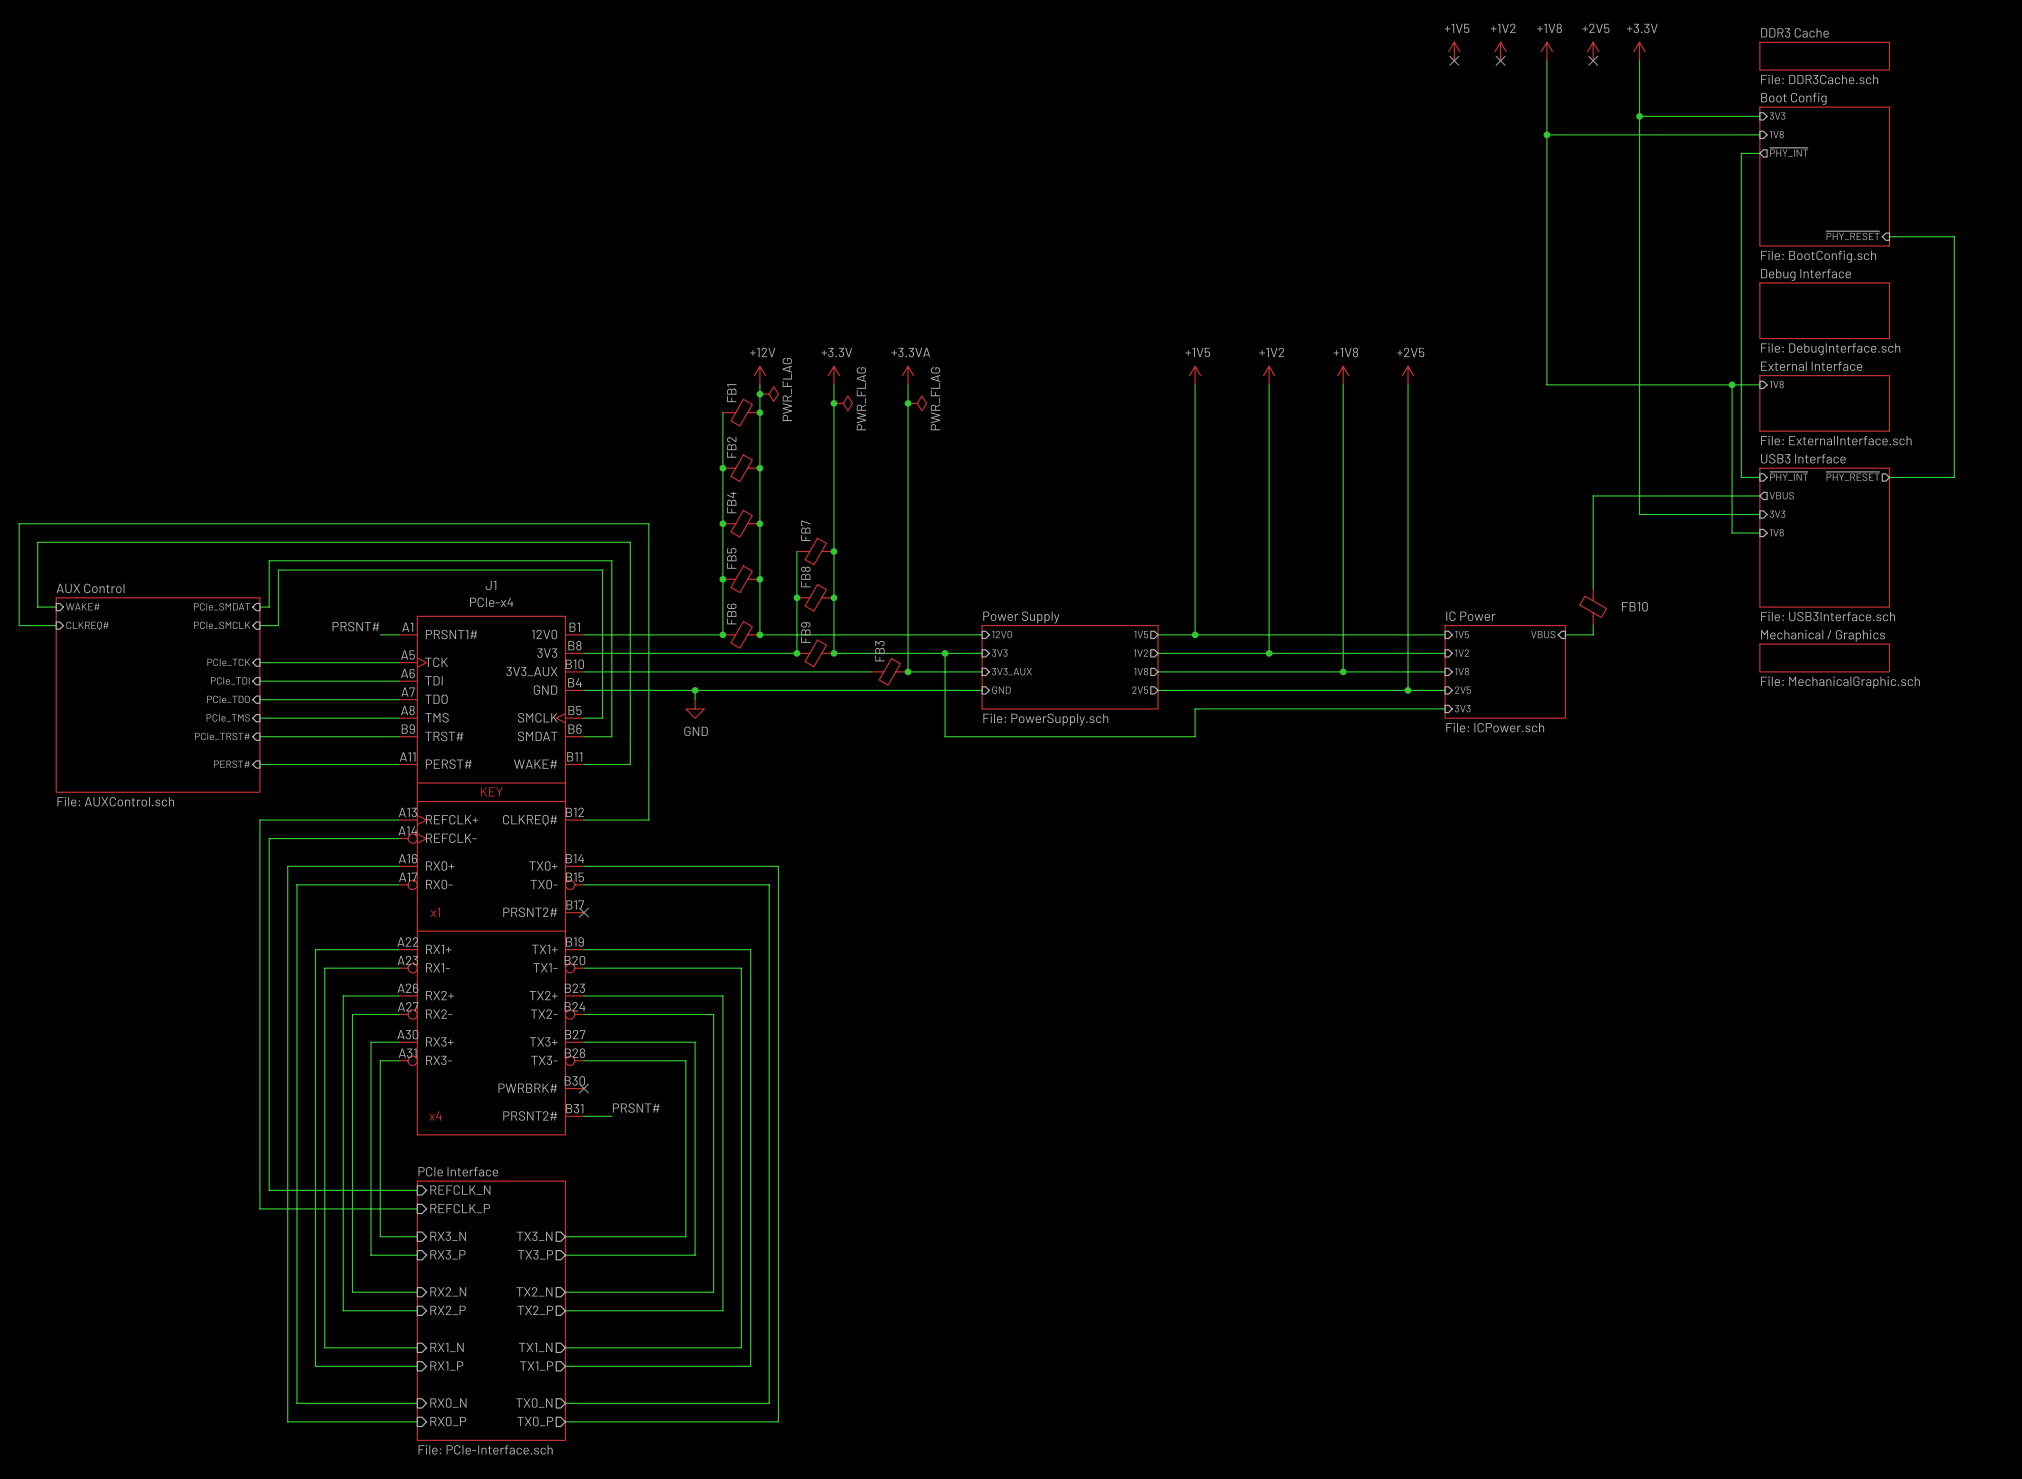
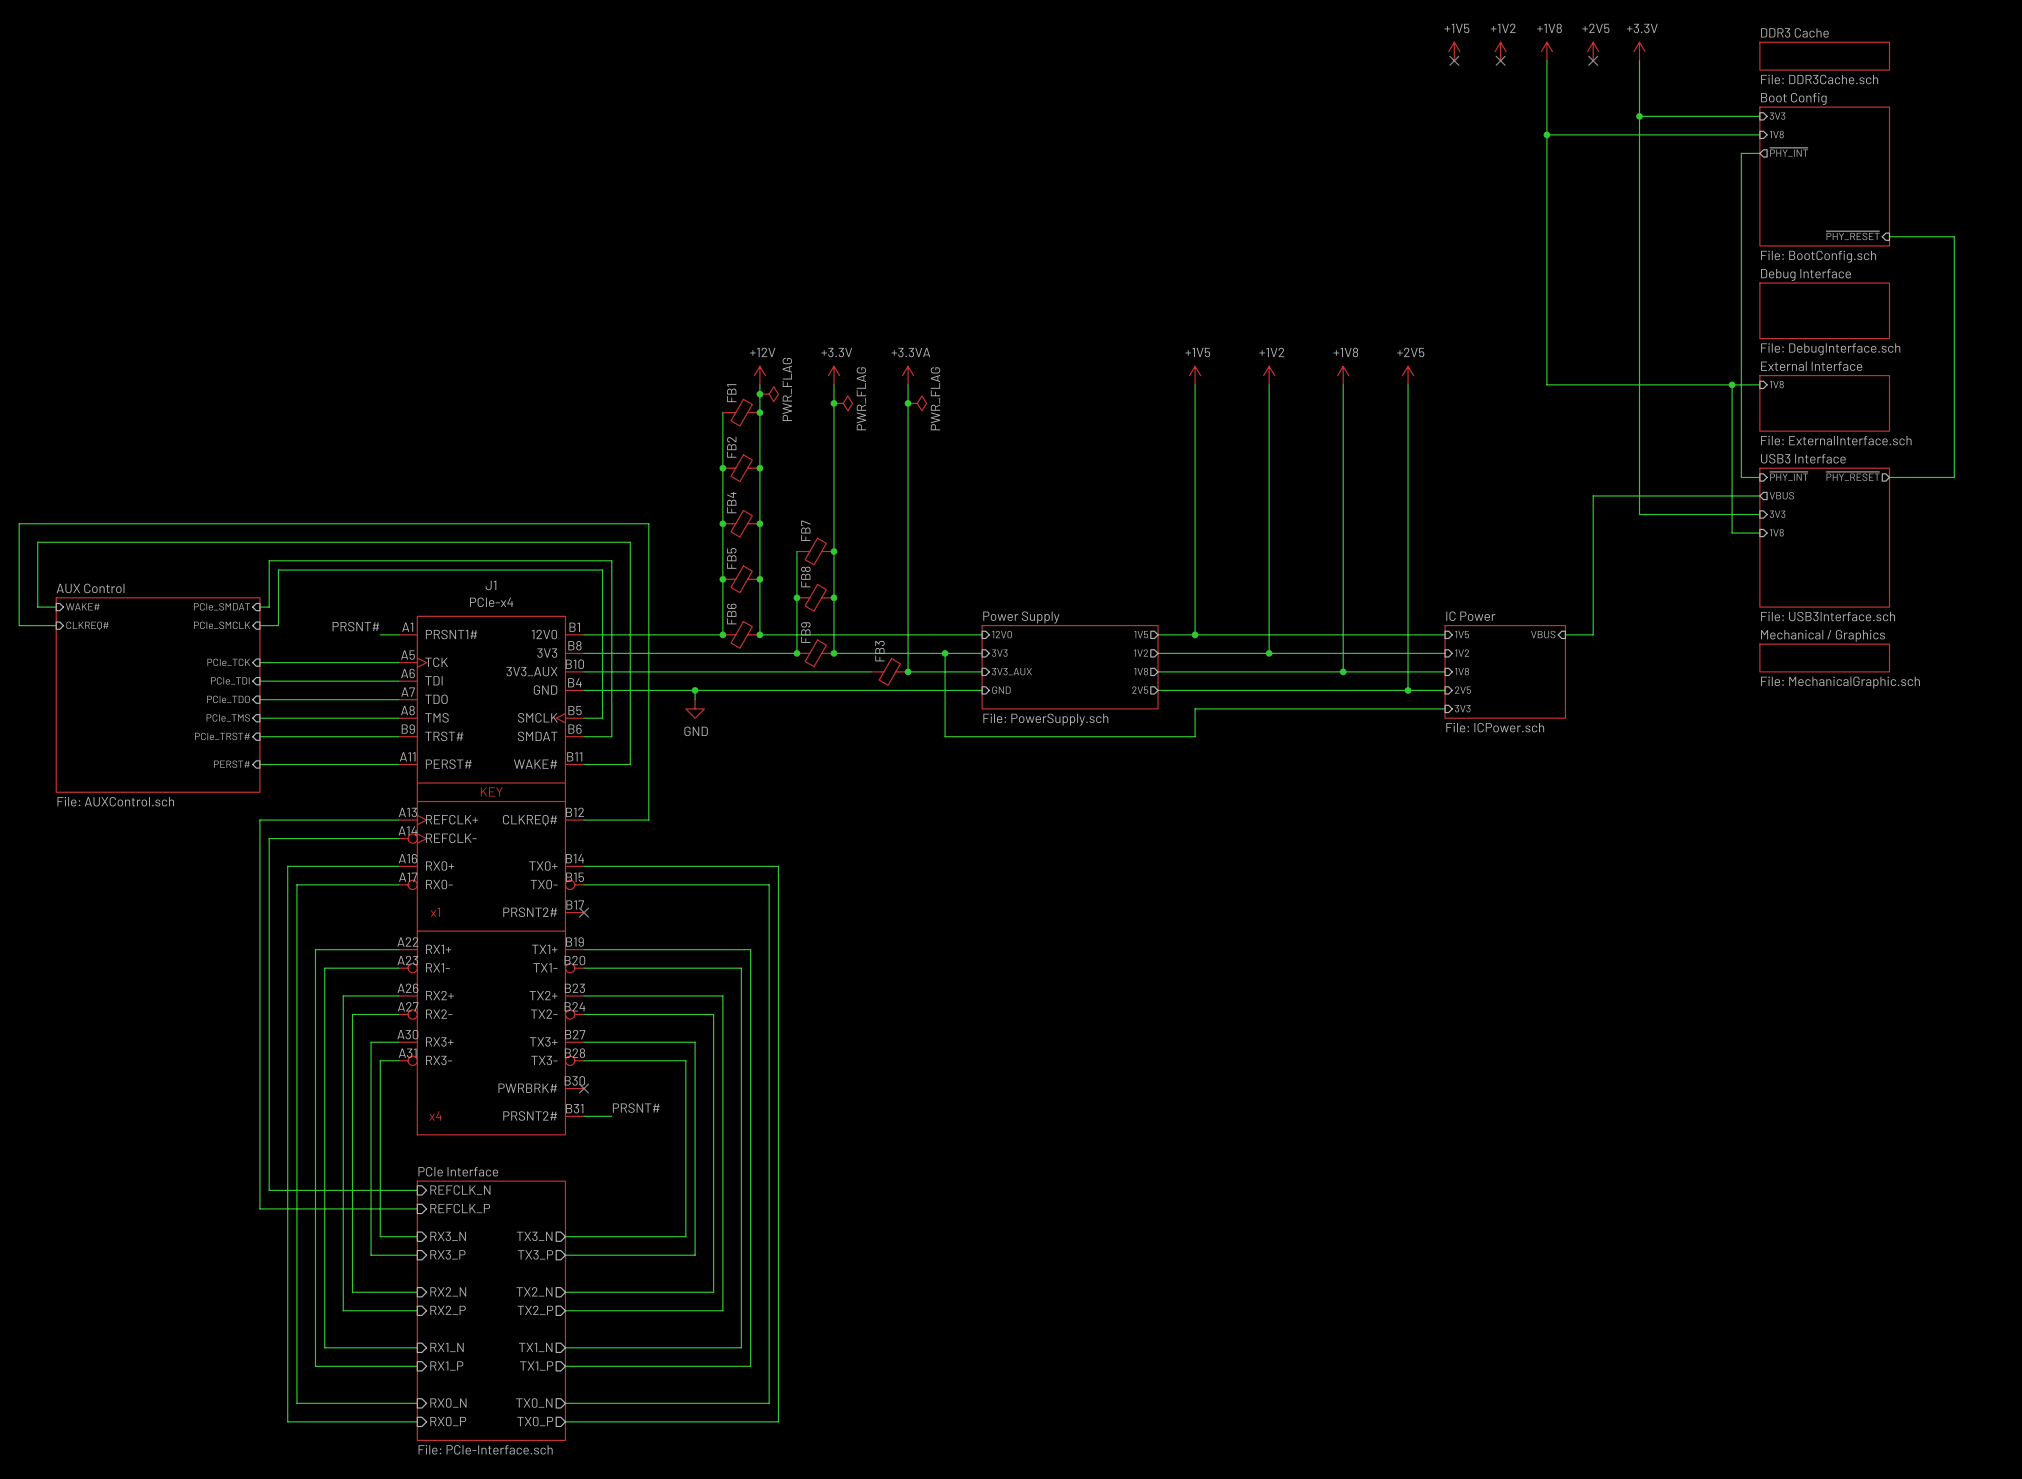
FB10: (1593, 607) -> none

